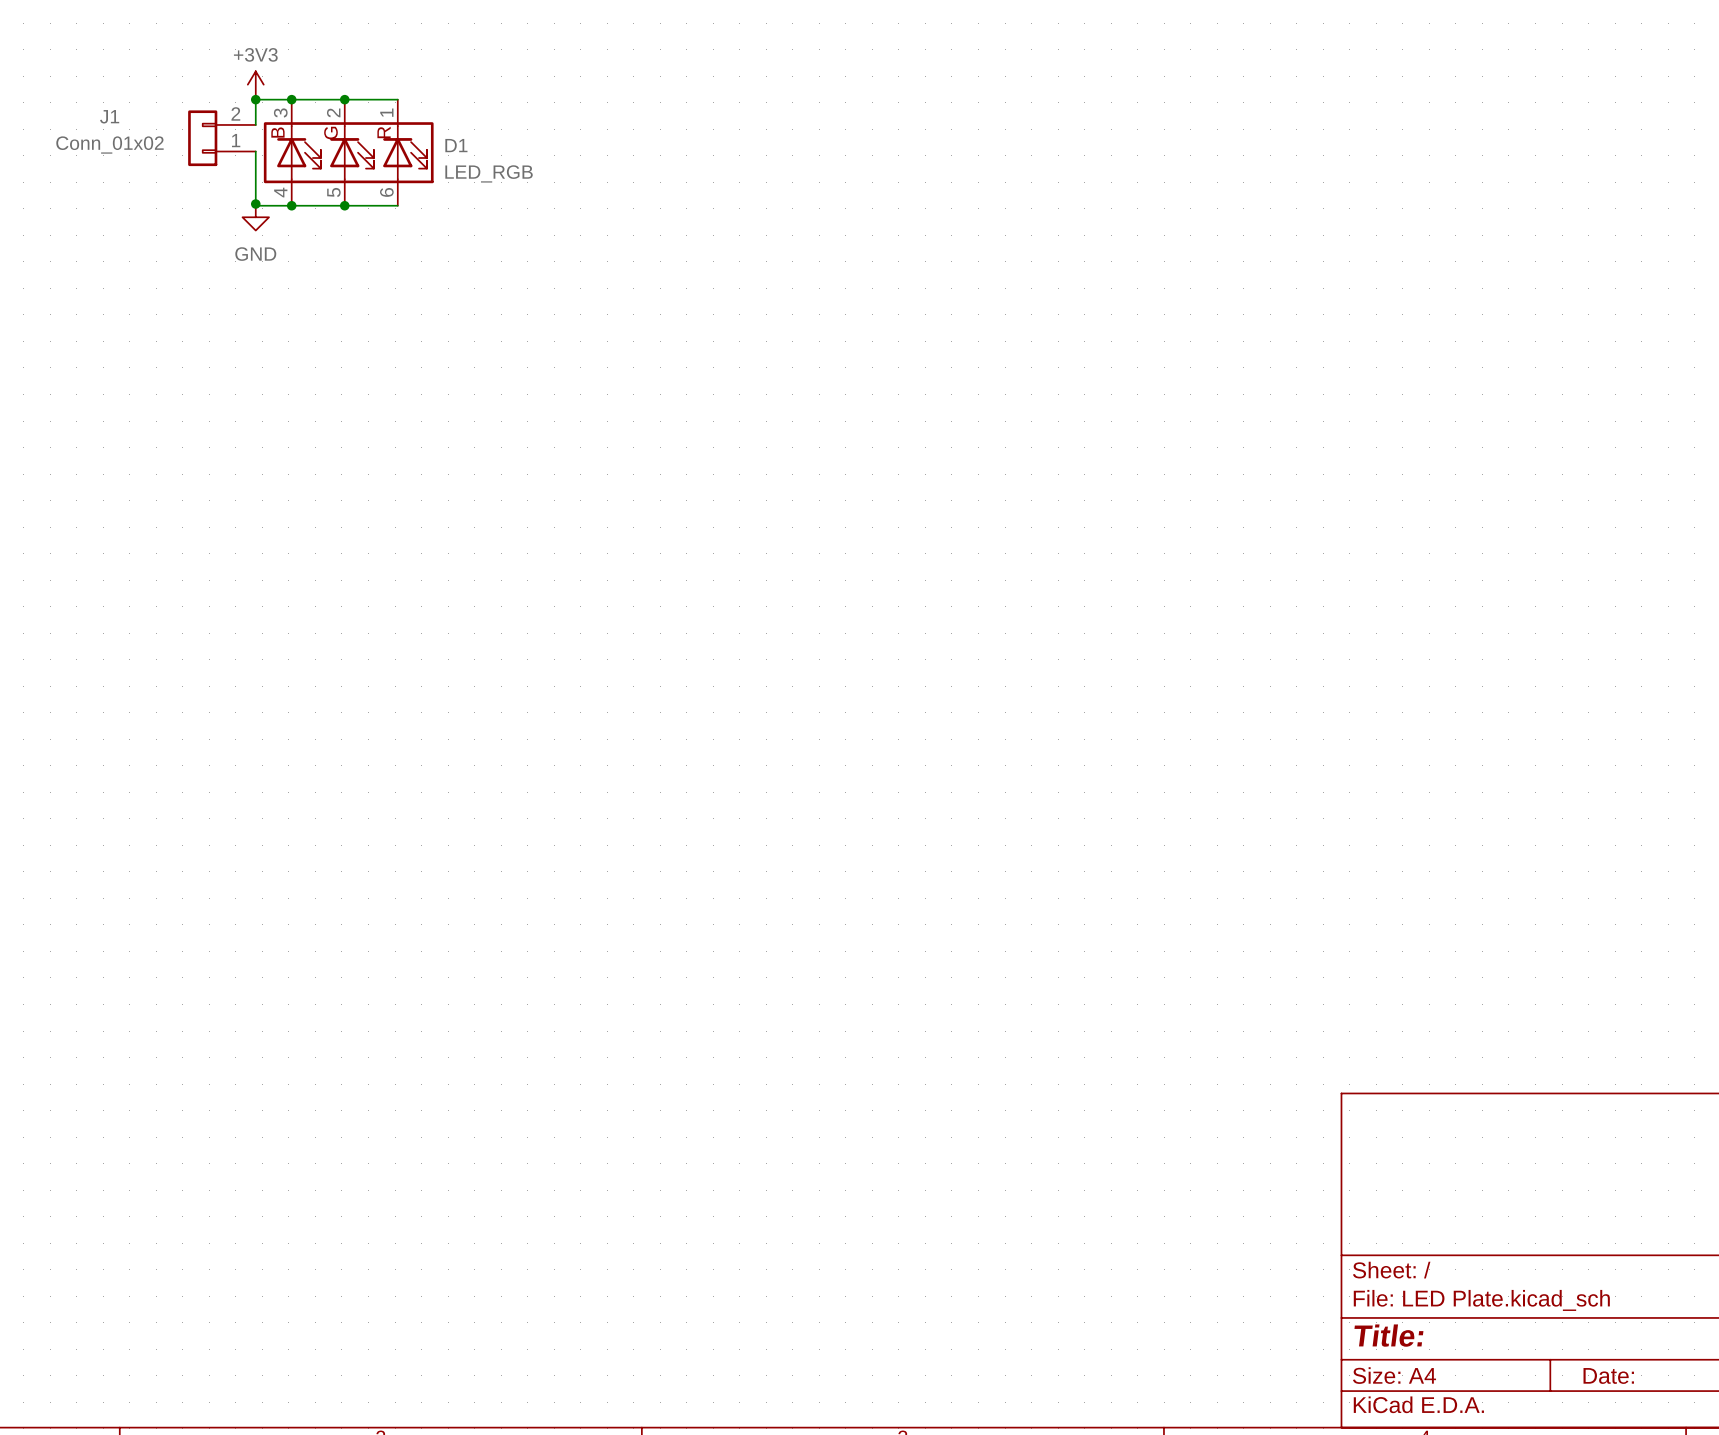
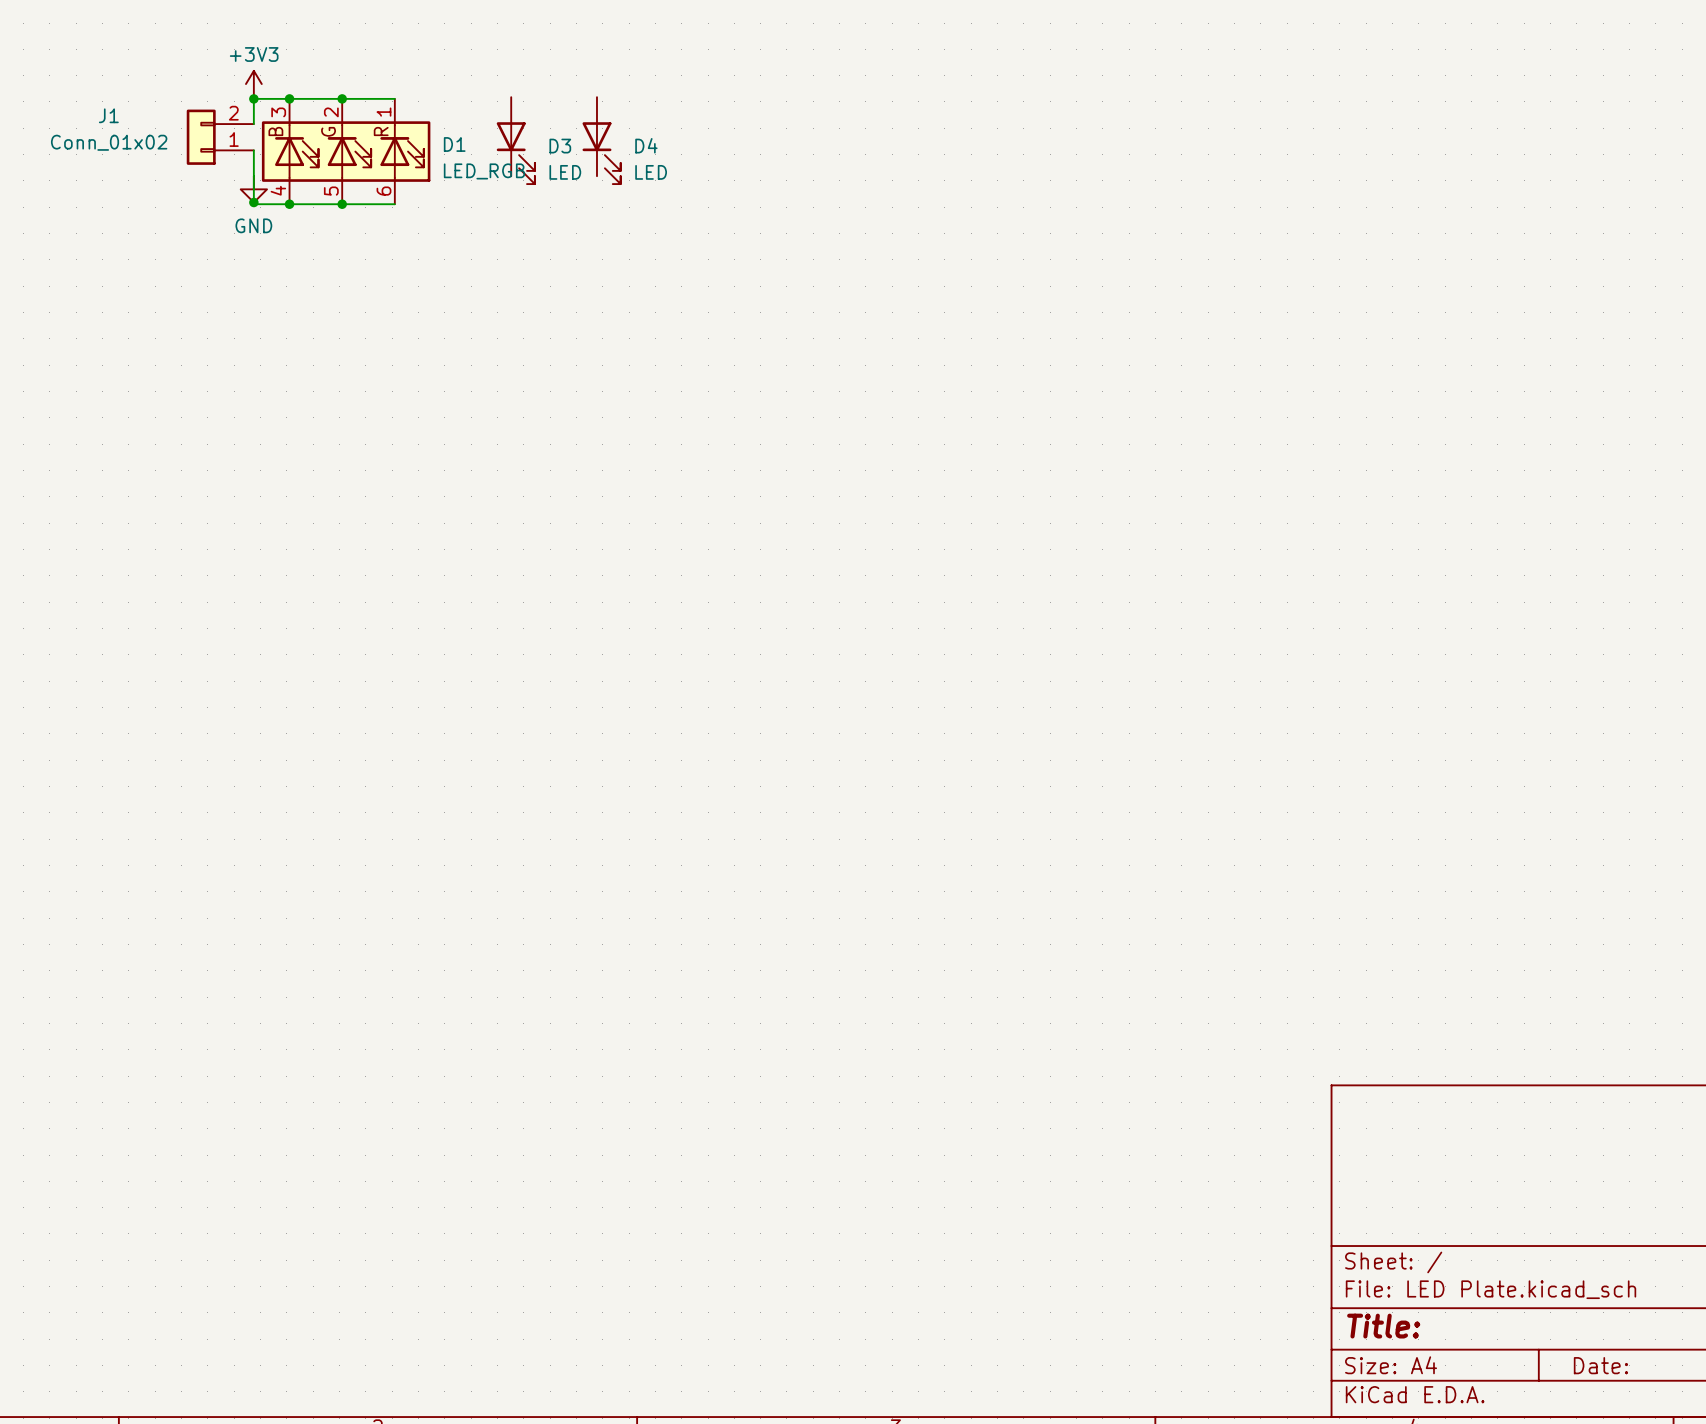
D3: none -> LED (515, 140)
D4: none -> LED (601, 140)
power symbol position: GND (255, 217) -> GND (253, 189)

